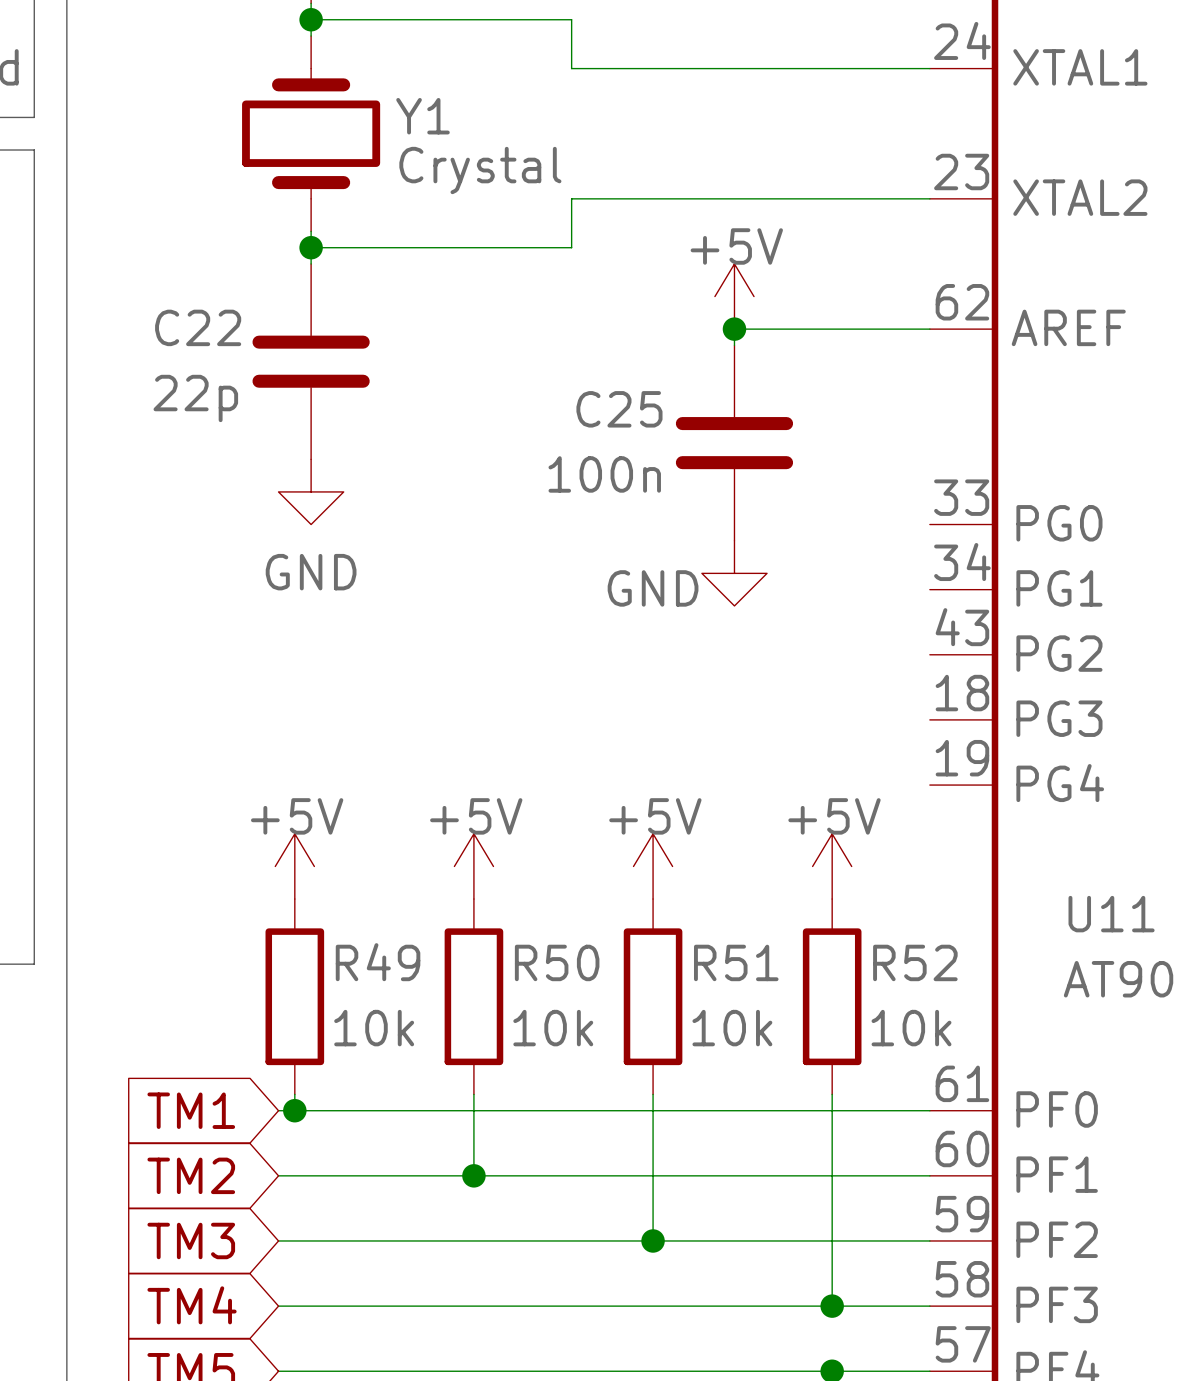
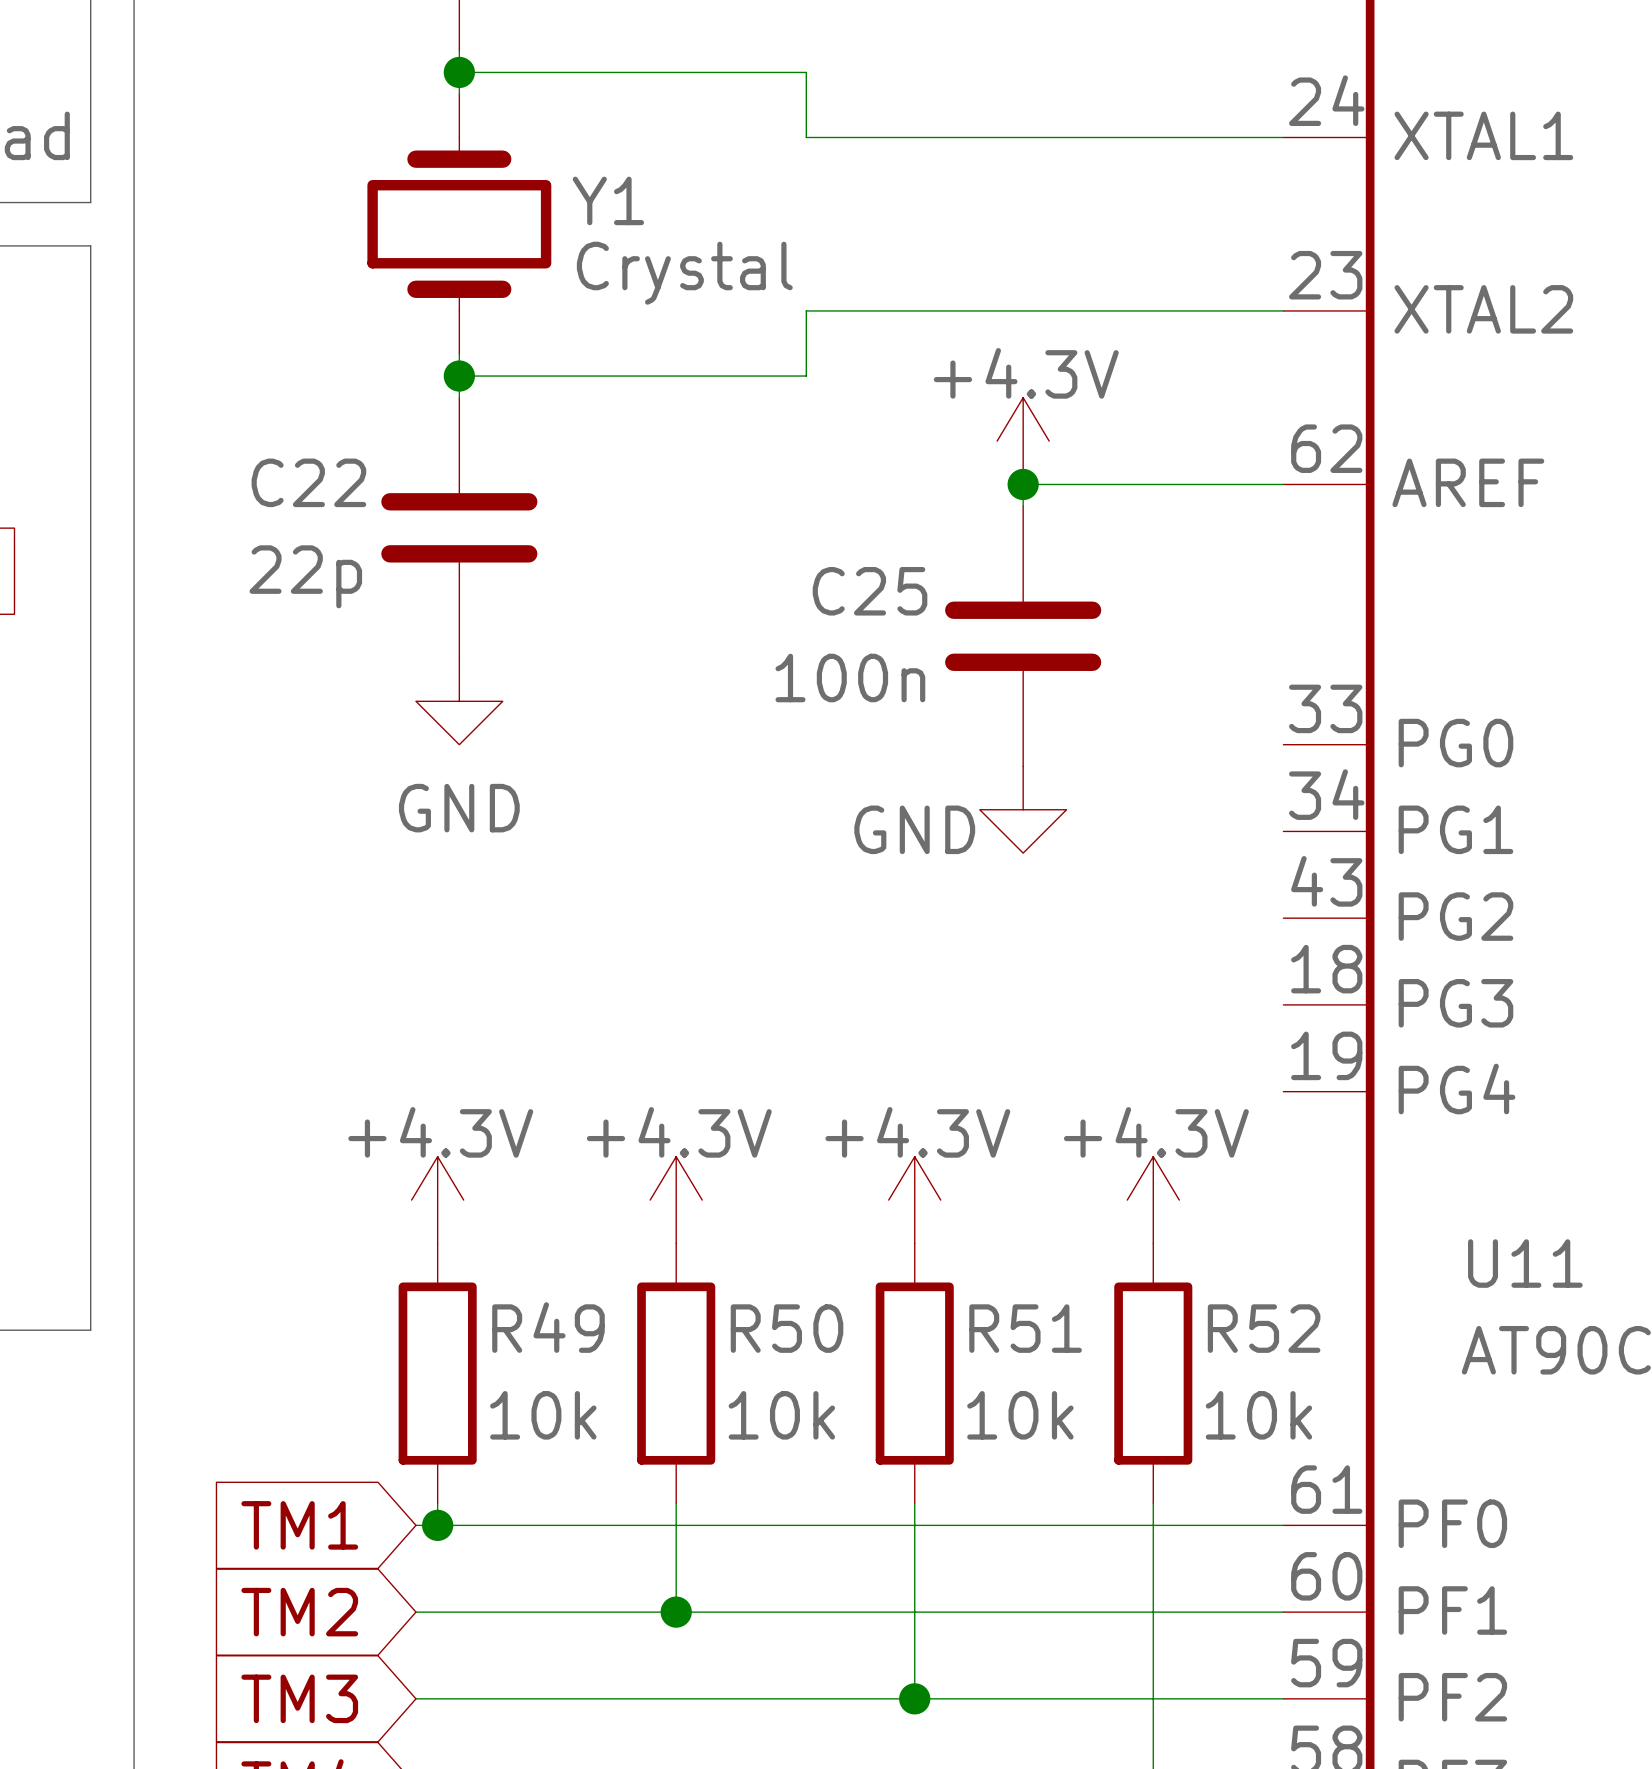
power symbol: +5V (734, 296) -> +4.3V (1023, 441)
power symbol: +5V (294, 866) -> +4.3V (437, 1200)
power symbol: +5V (473, 866) -> +4.3V (676, 1200)
power symbol: +5V (653, 866) -> +4.3V (914, 1200)
power symbol: +5V (832, 866) -> +4.3V (1153, 1200)

